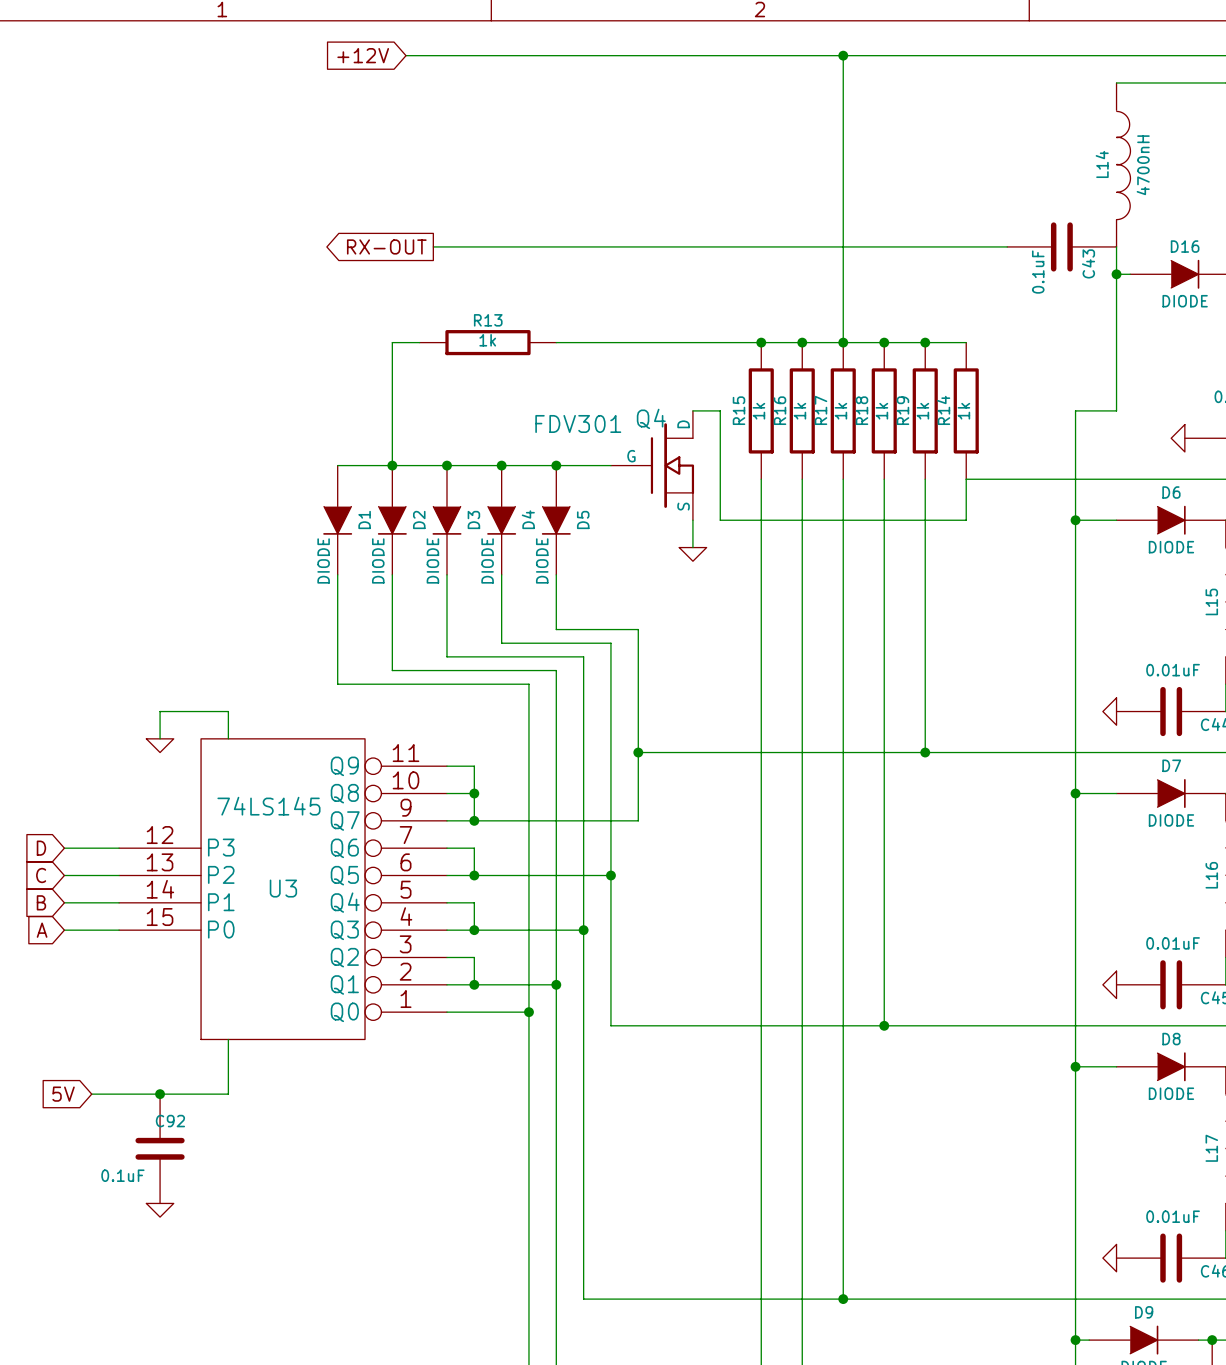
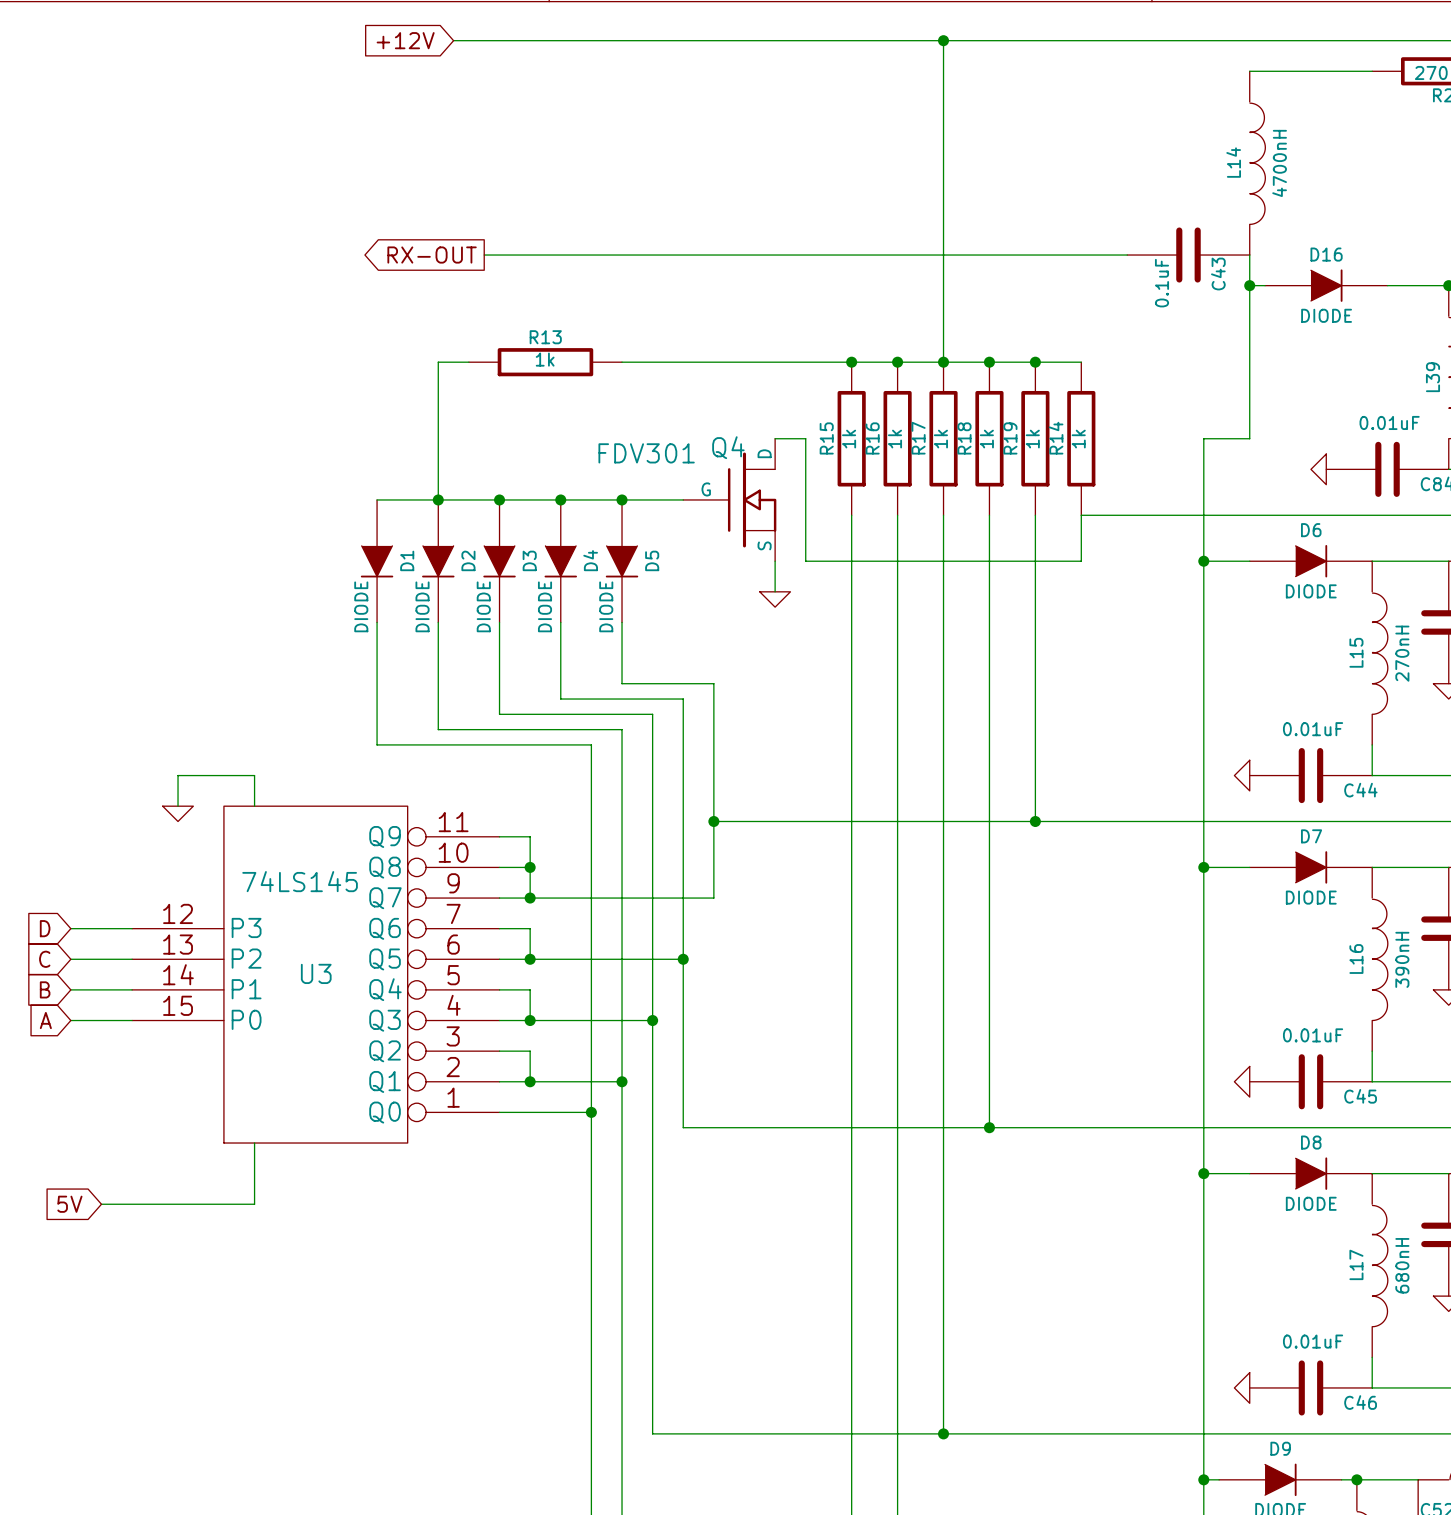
junction: (160, 1094) -> none
C92: 0.1uF (160, 1148) -> none
power symbol: (160, 1210) -> none

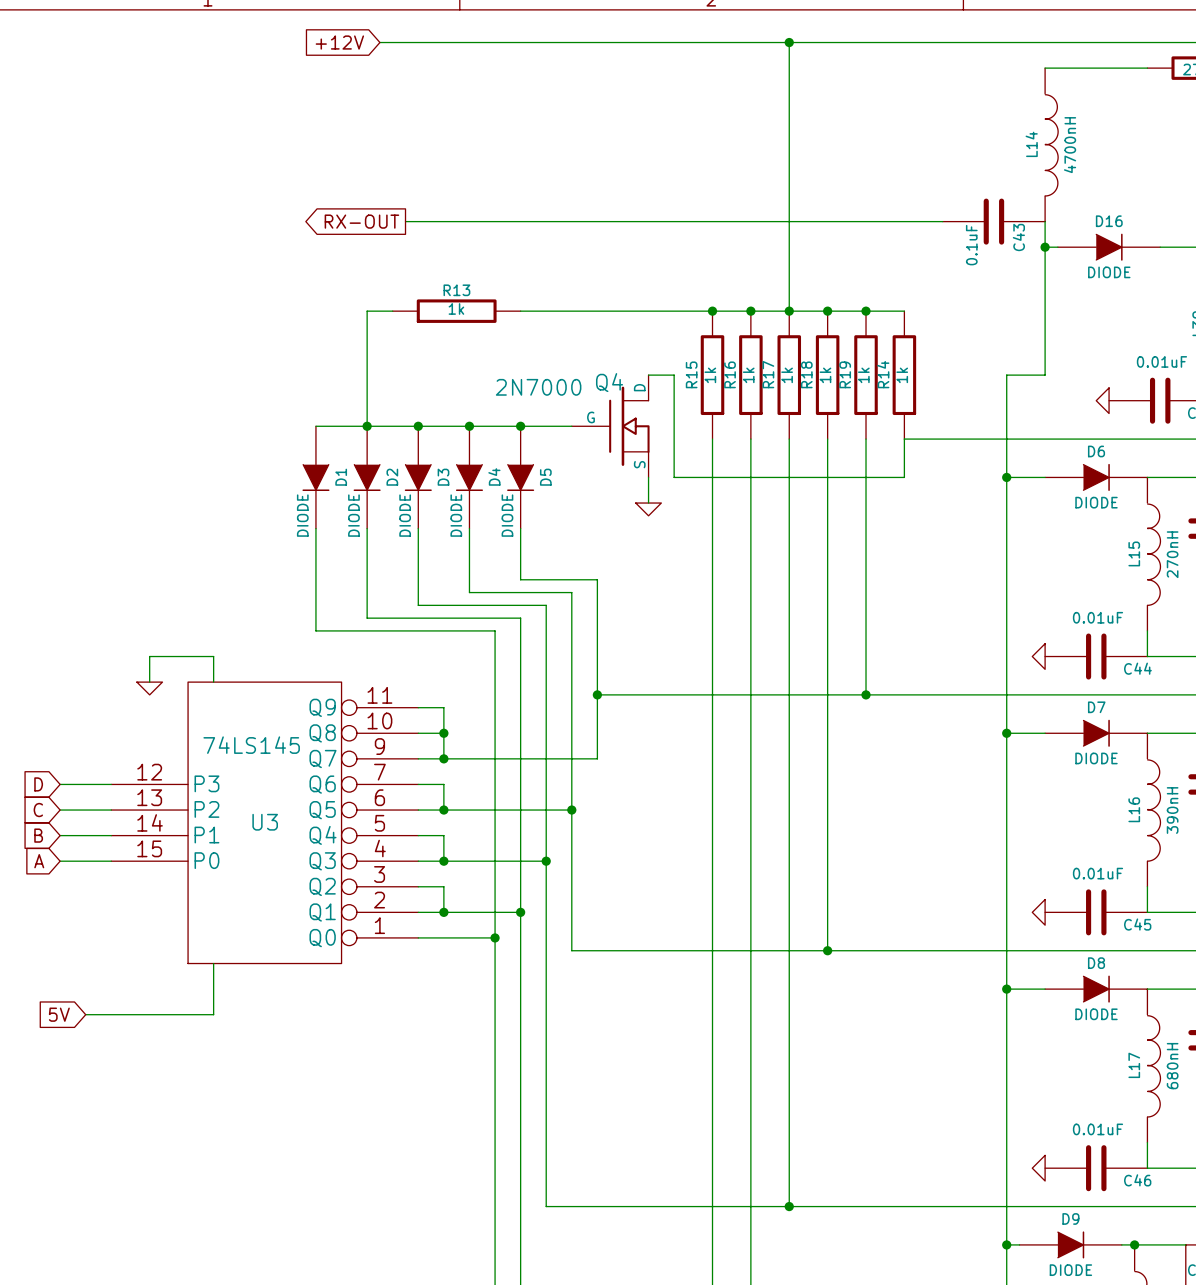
Q4 value: FDV301 (646, 453) -> 2N7000 (538, 387)

